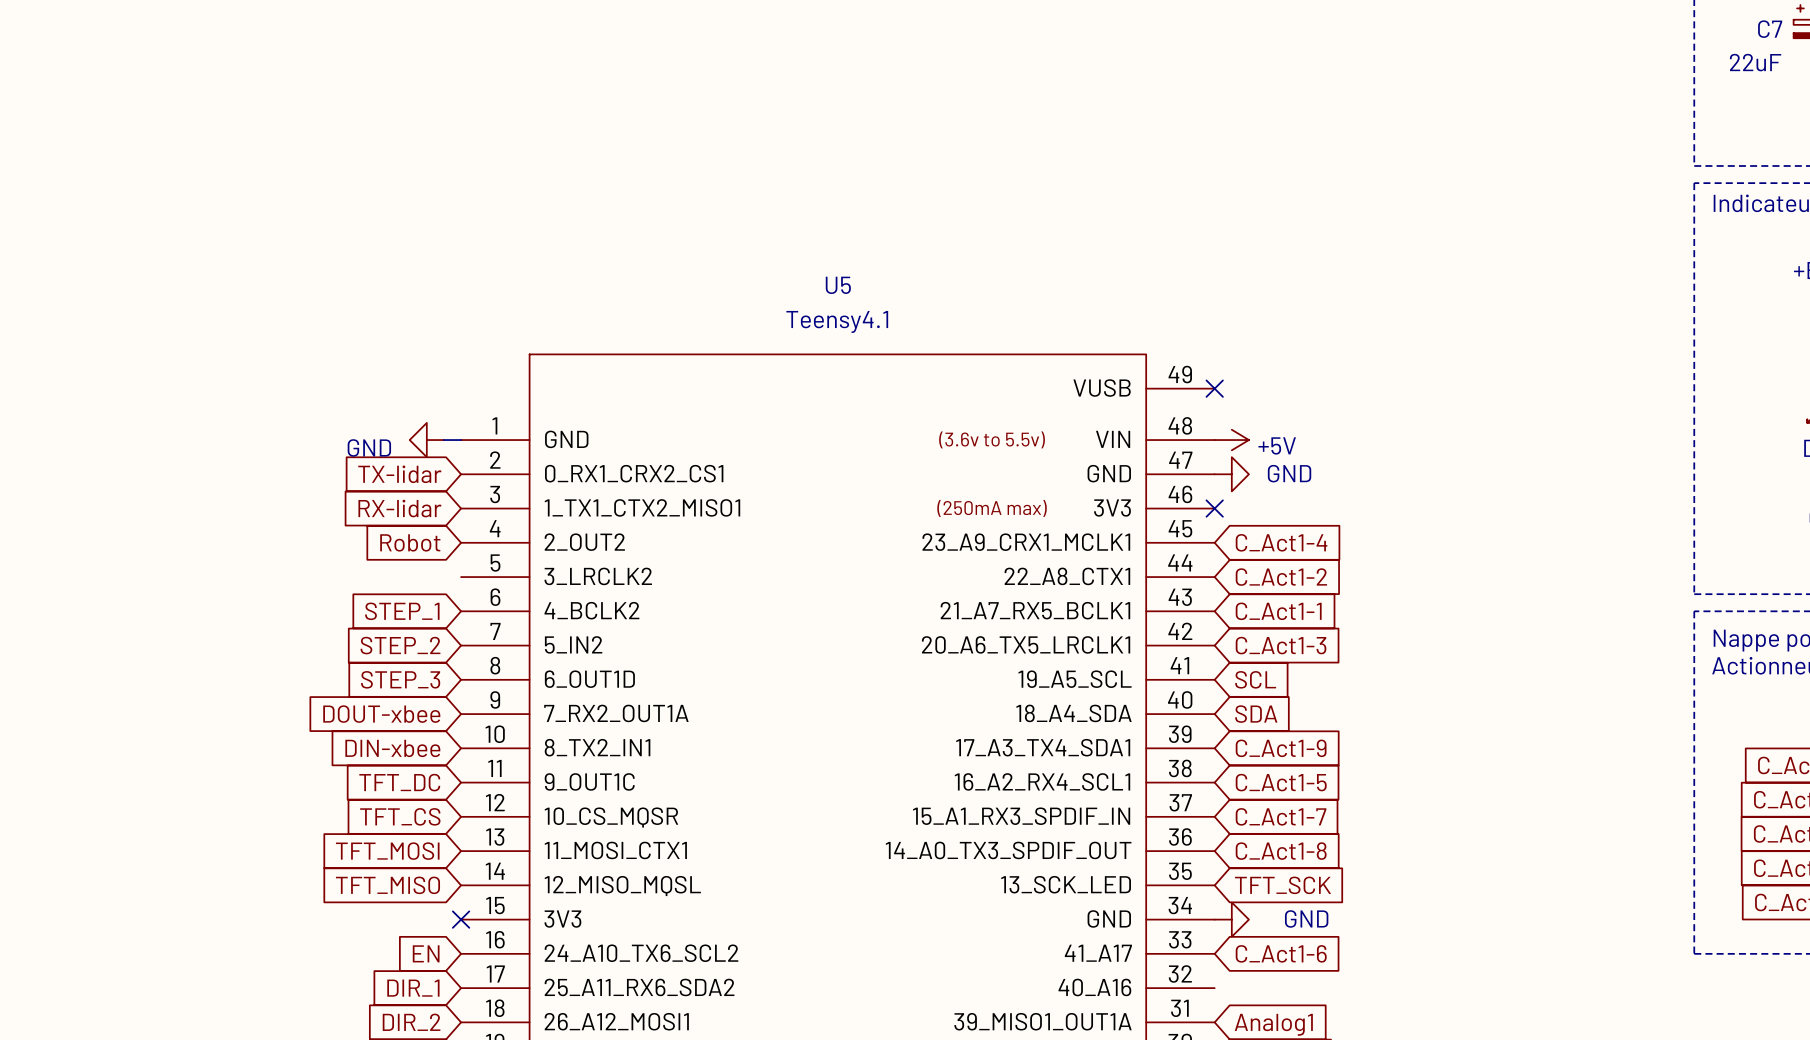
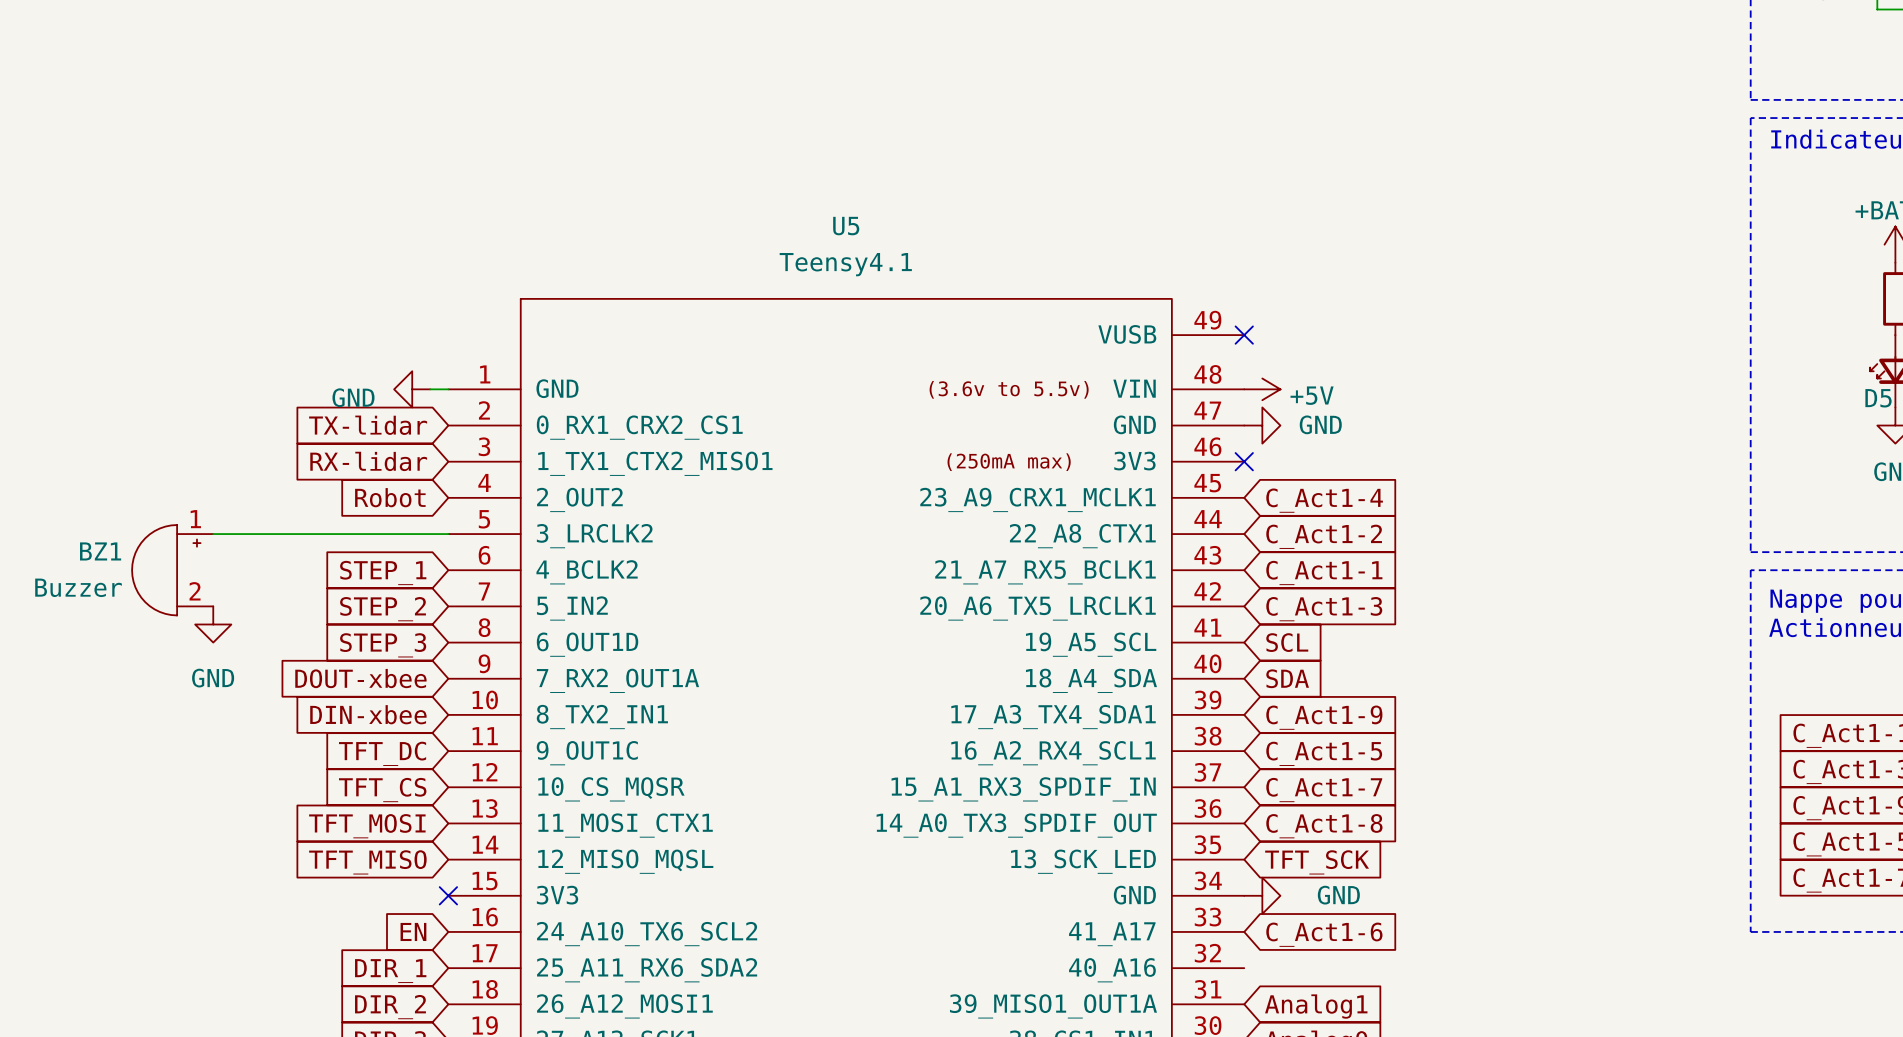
wire: none -> (213, 534) (448, 534)
BZ1: none -> Buzzer (172, 570)
power symbol: none -> GND (213, 624)

